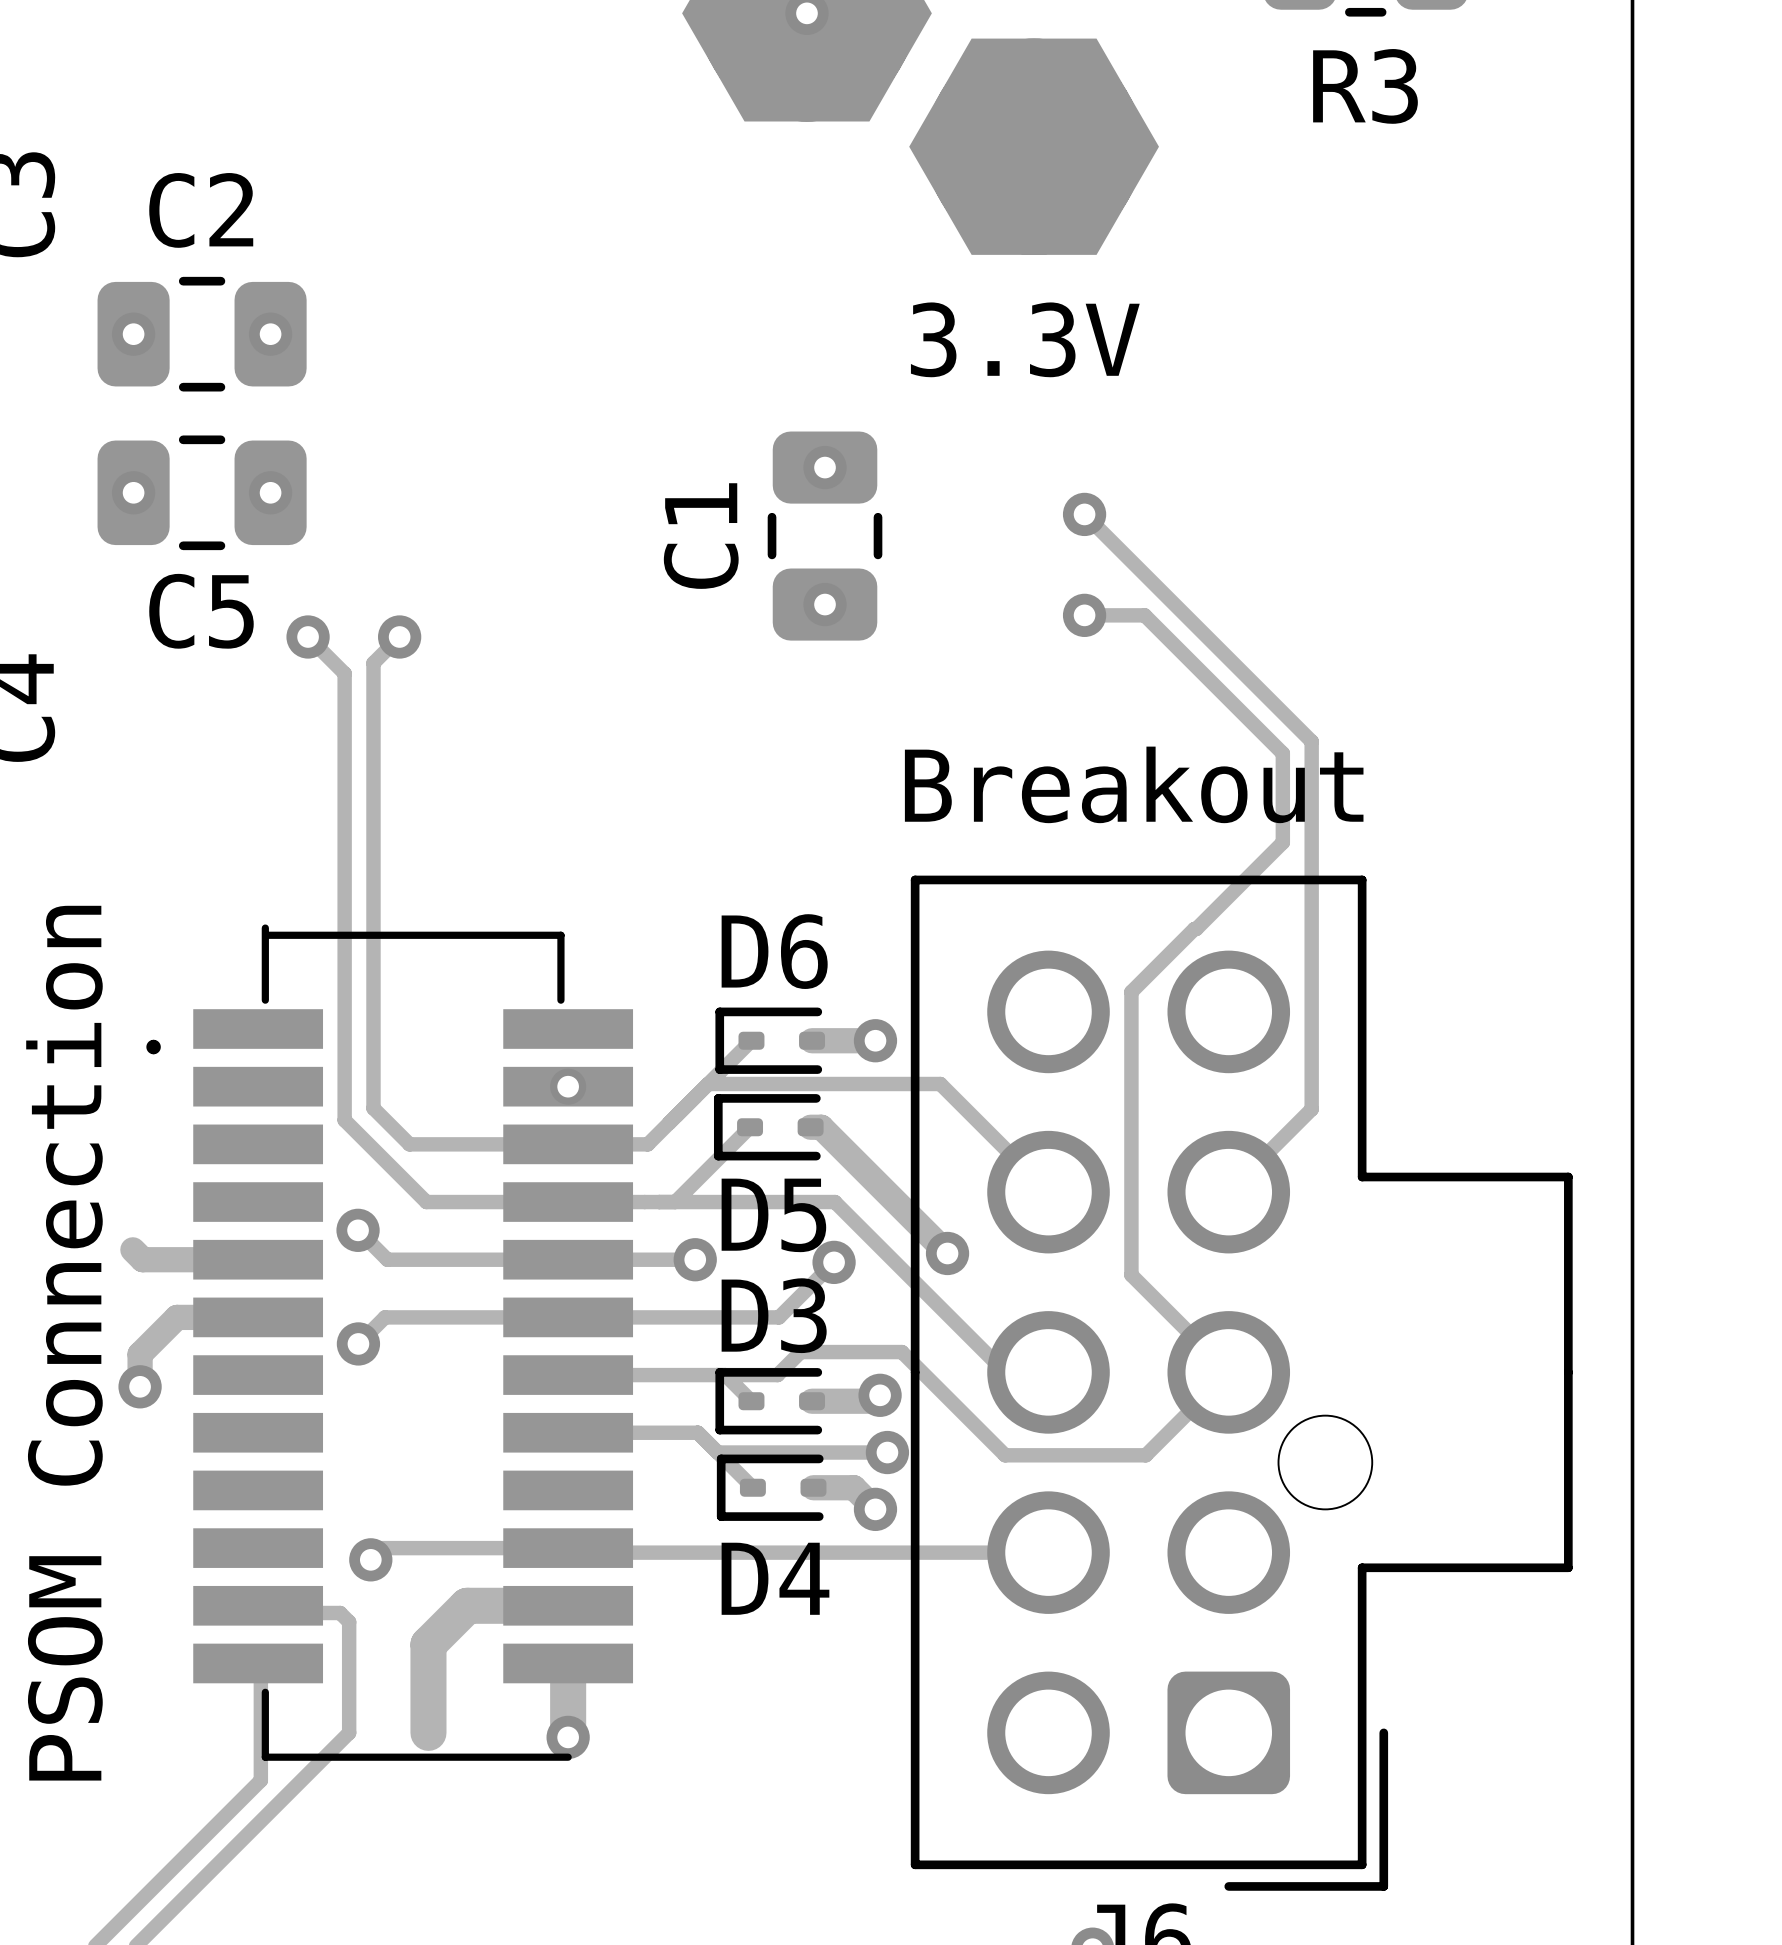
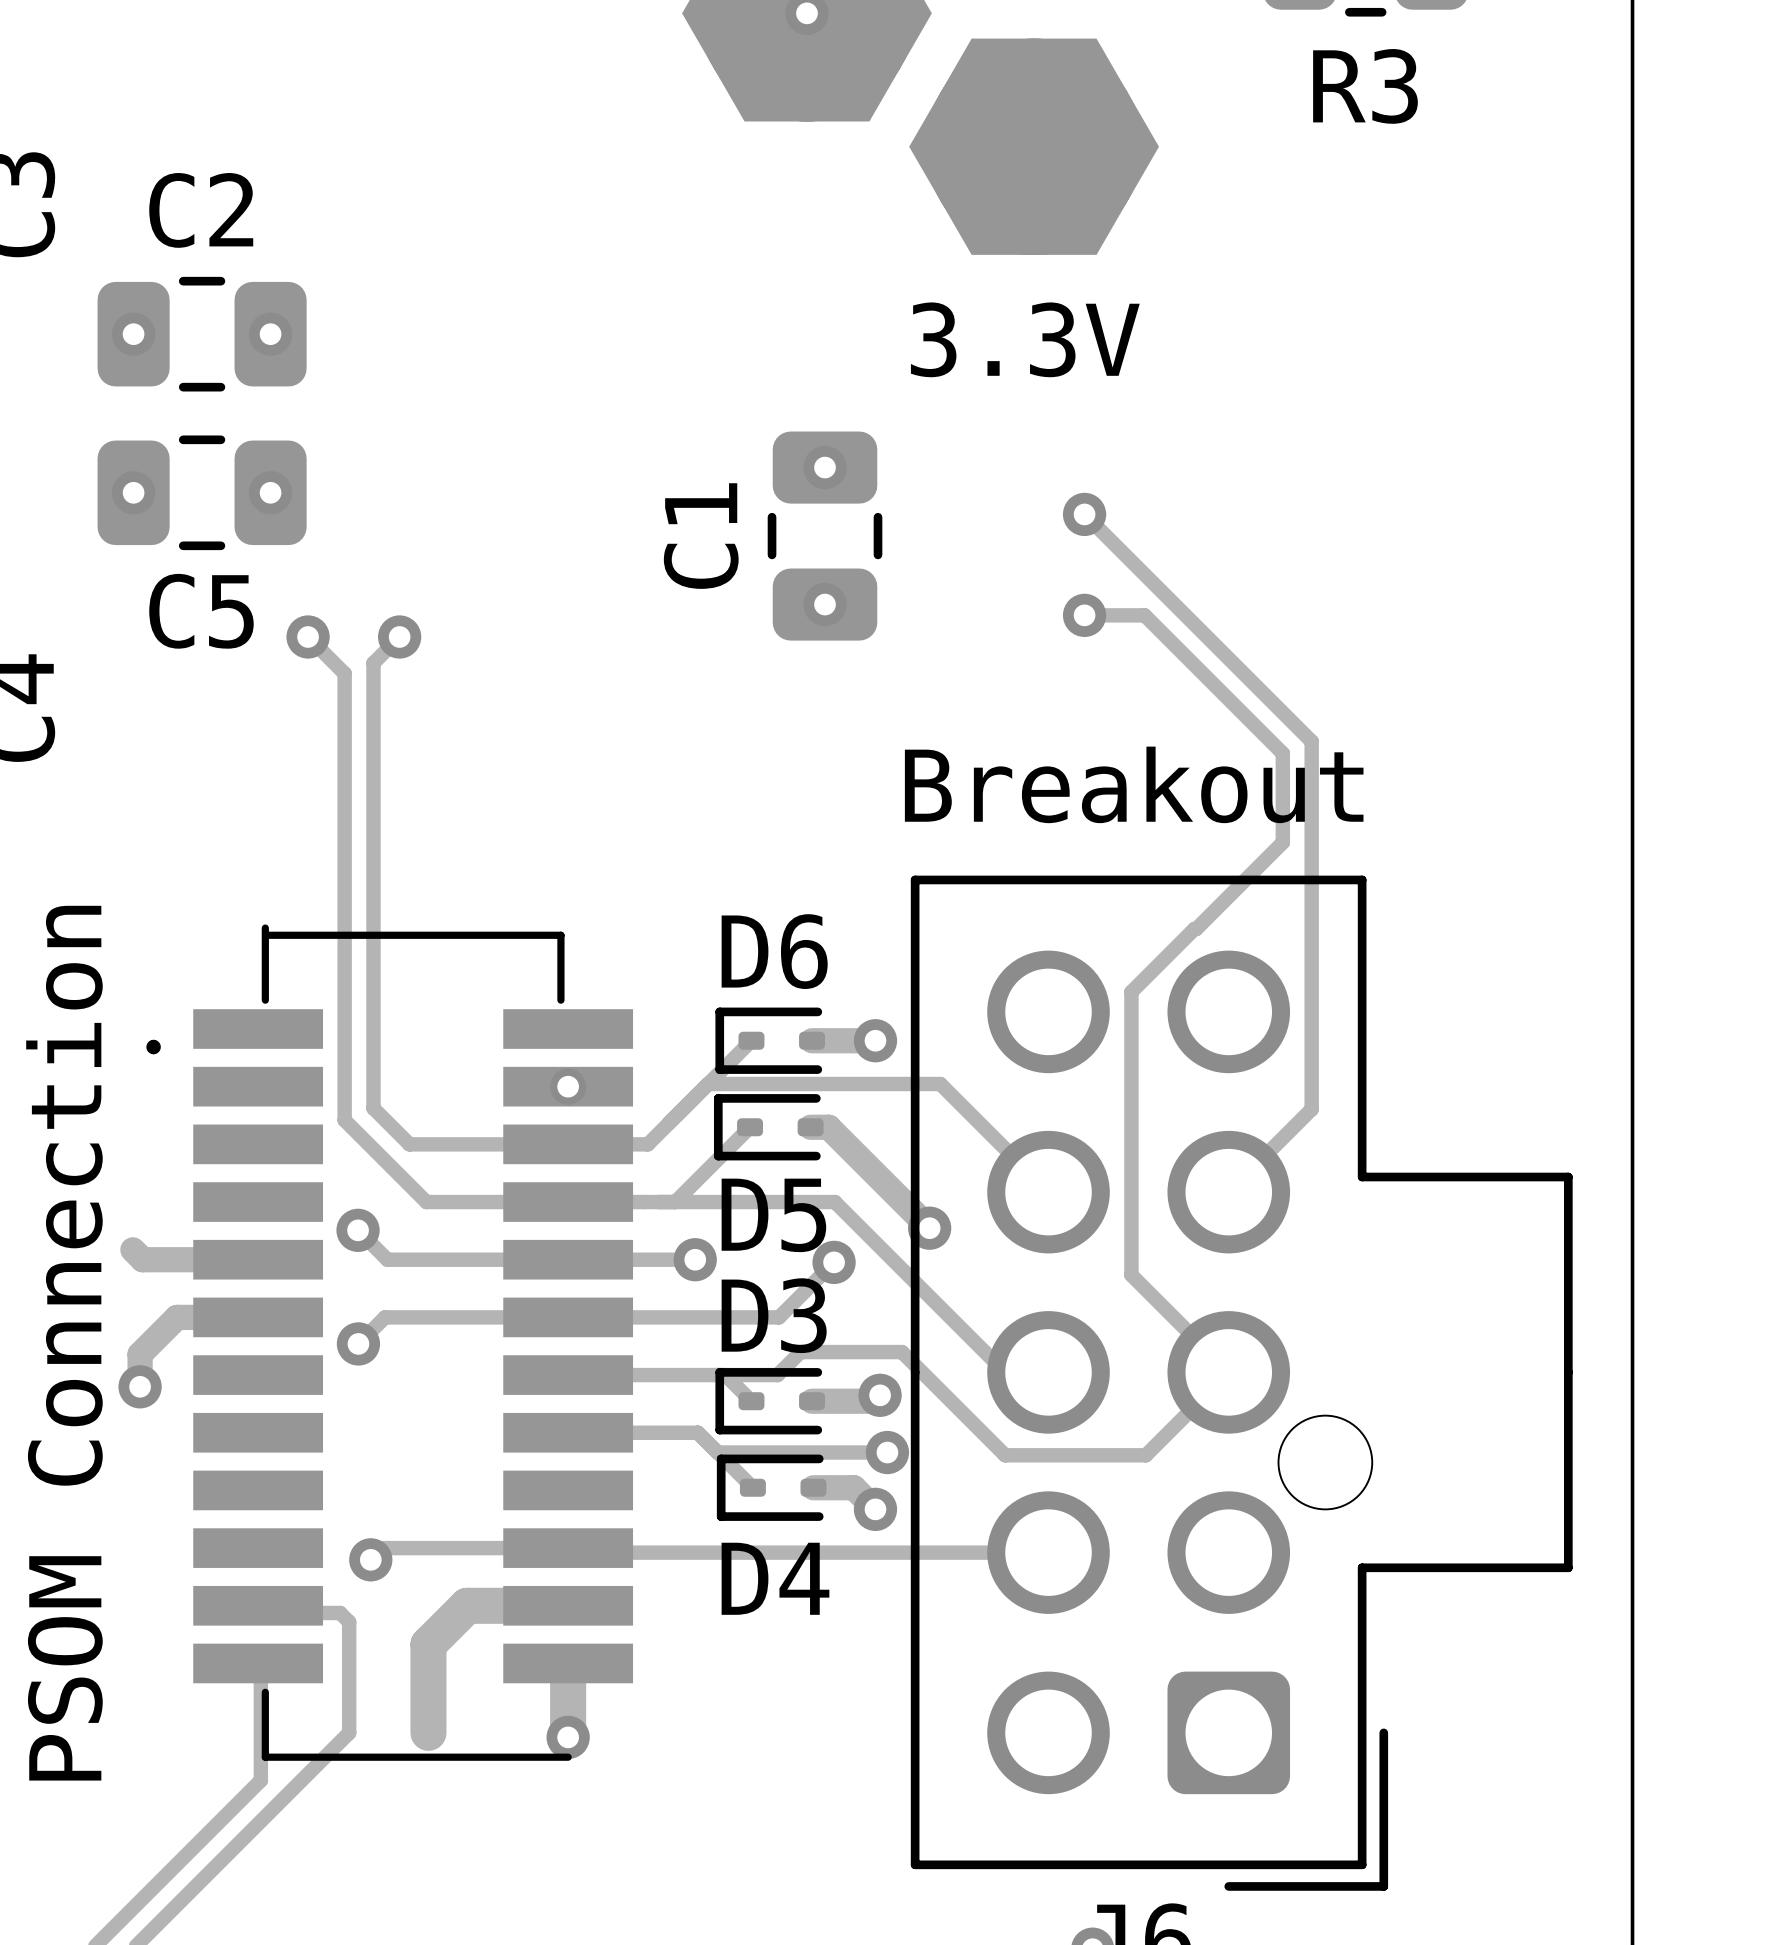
track: (821, 1127) (947, 1253) -> (821, 1127) (828, 1127) (929, 1228)
via position: (947, 1253) -> (929, 1228)

